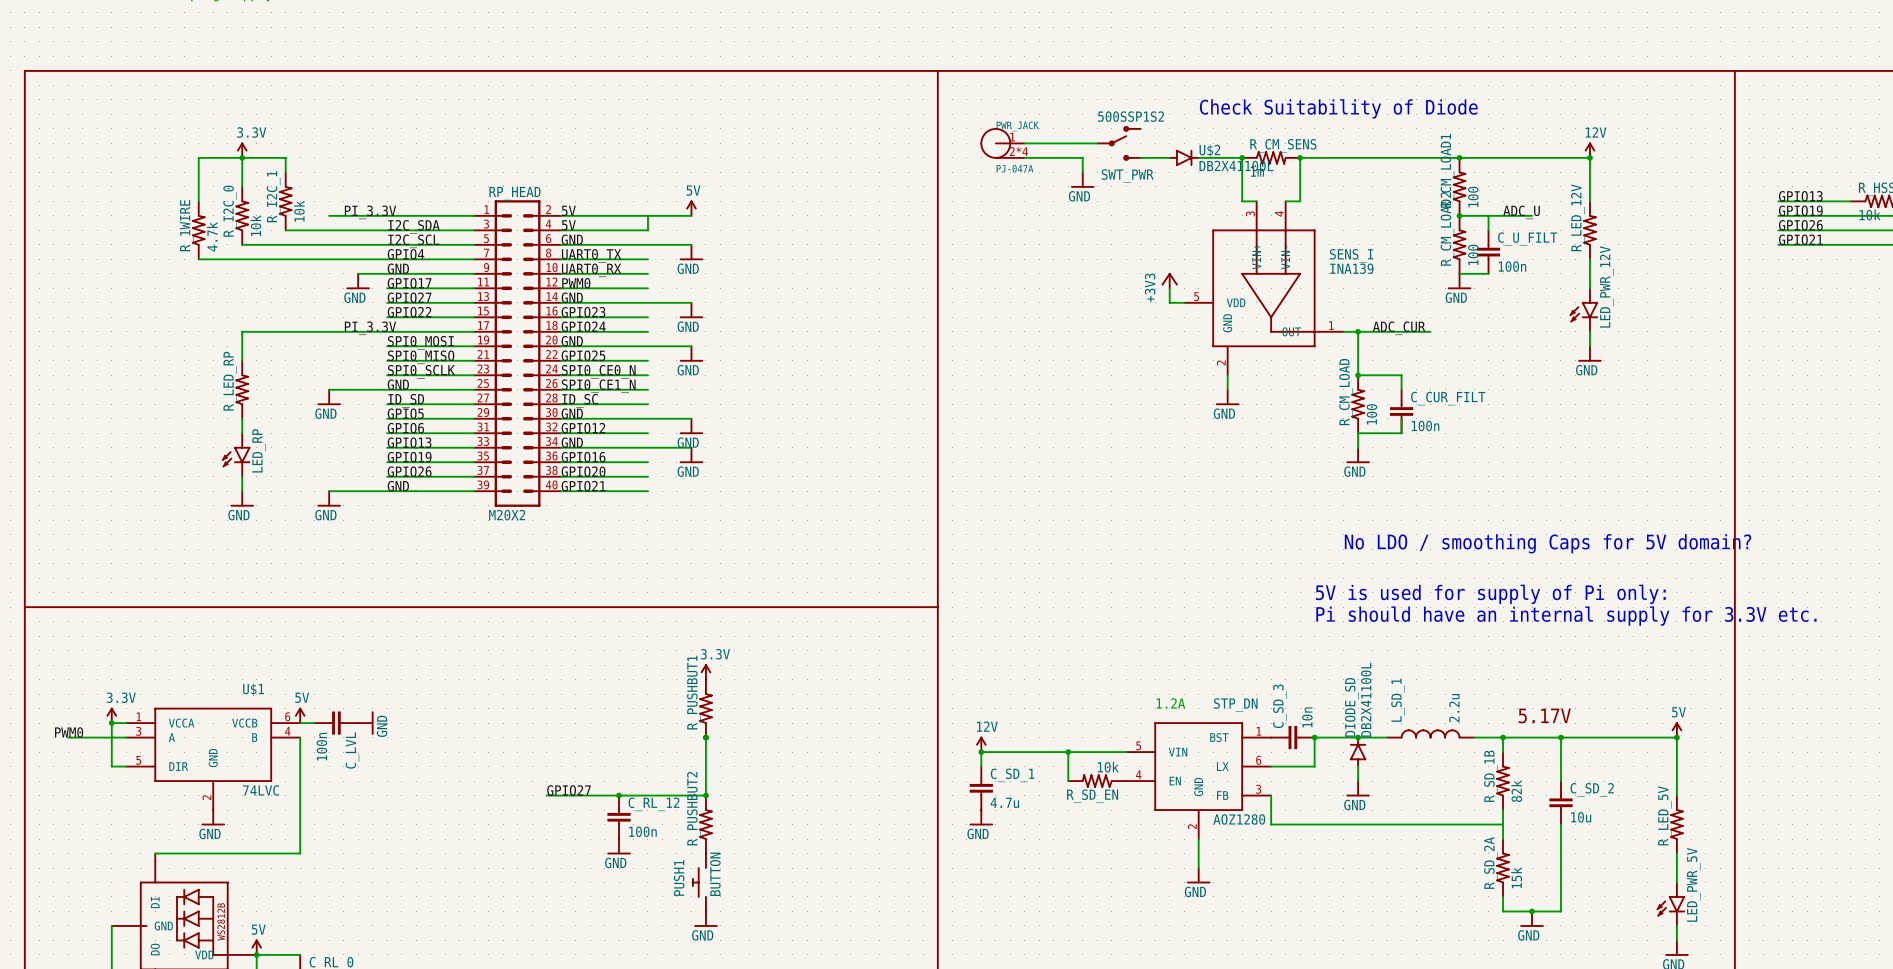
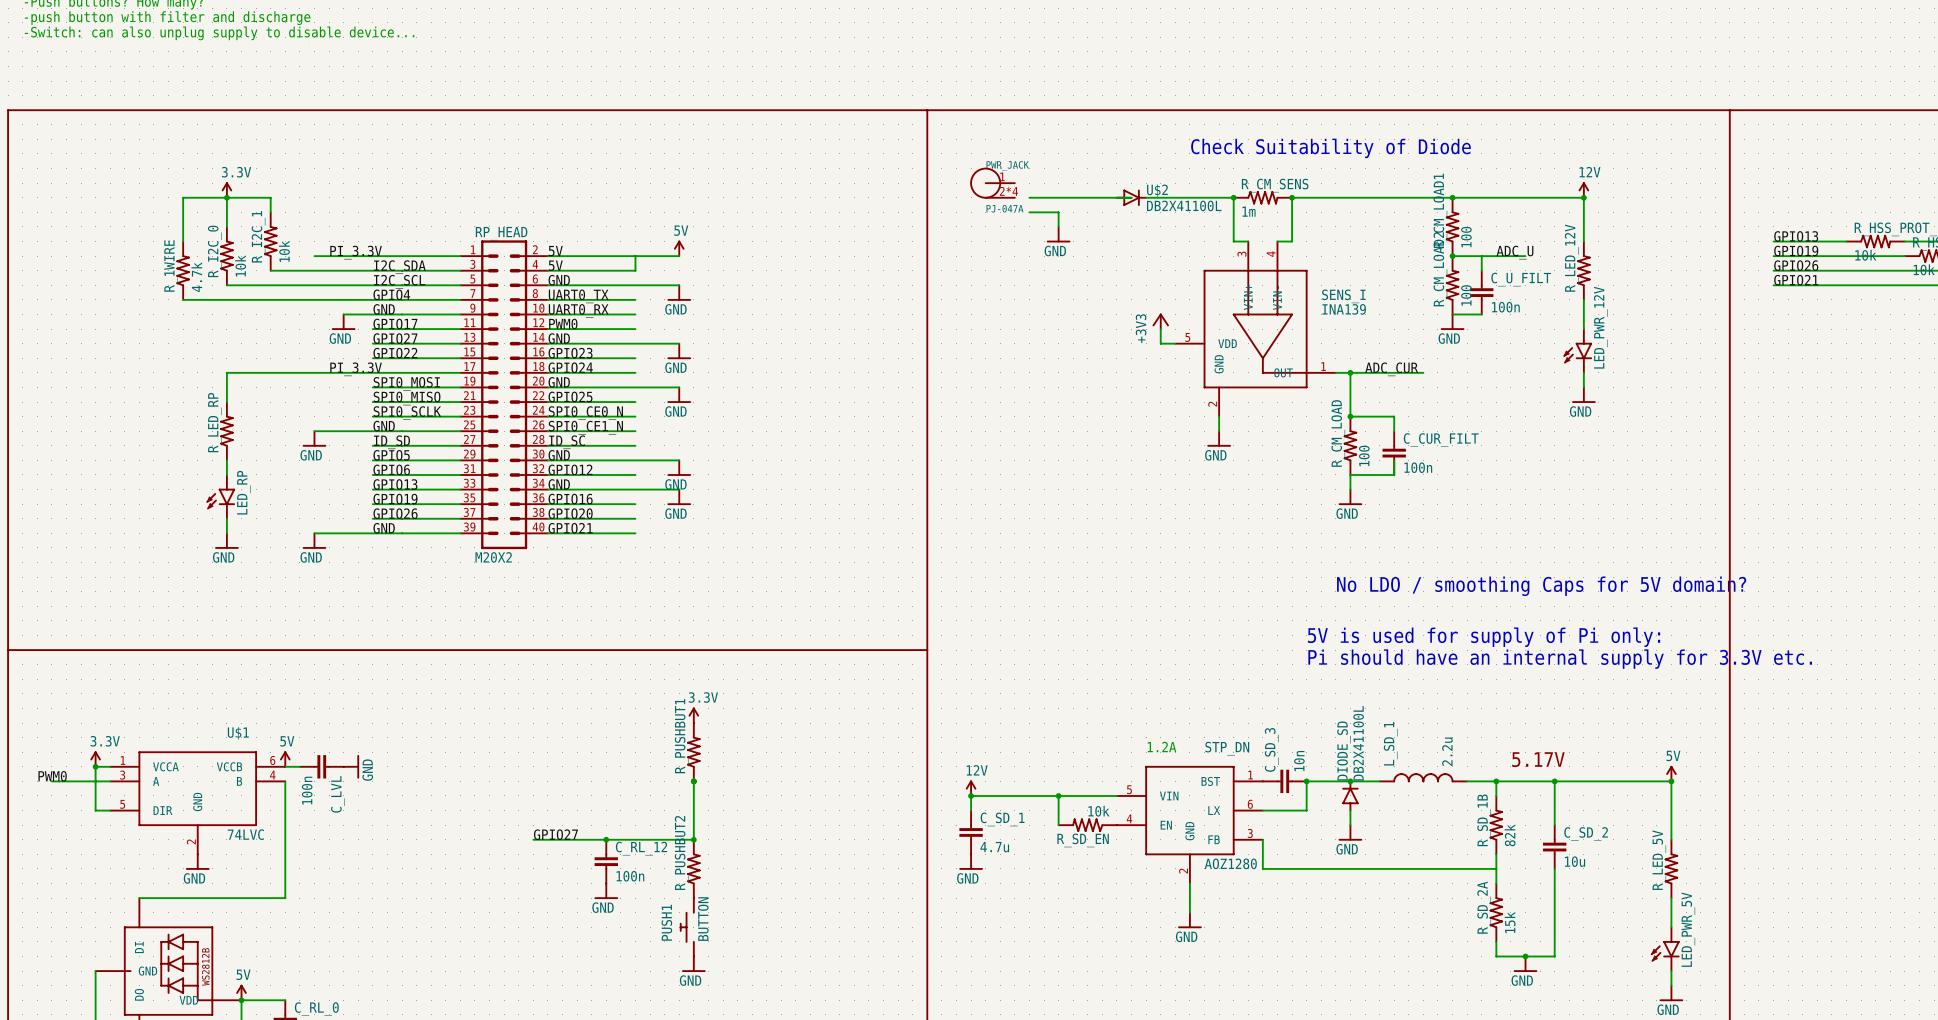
wire: (1024, 143) (1097, 143) -> none
SWT_PWR: 500SSP1S2 (1118, 143) -> none
wire: (1024, 157) (1039, 157) -> none
wire: (1082, 157) (1082, 172) -> (1073, 197) (1131, 197)
U$2 position: (1184, 157) -> (1131, 197)
wire: none -> (1029, 212) (1058, 212) (1058, 226)
power symbol position: GND (1082, 180) -> GND (1058, 234)

